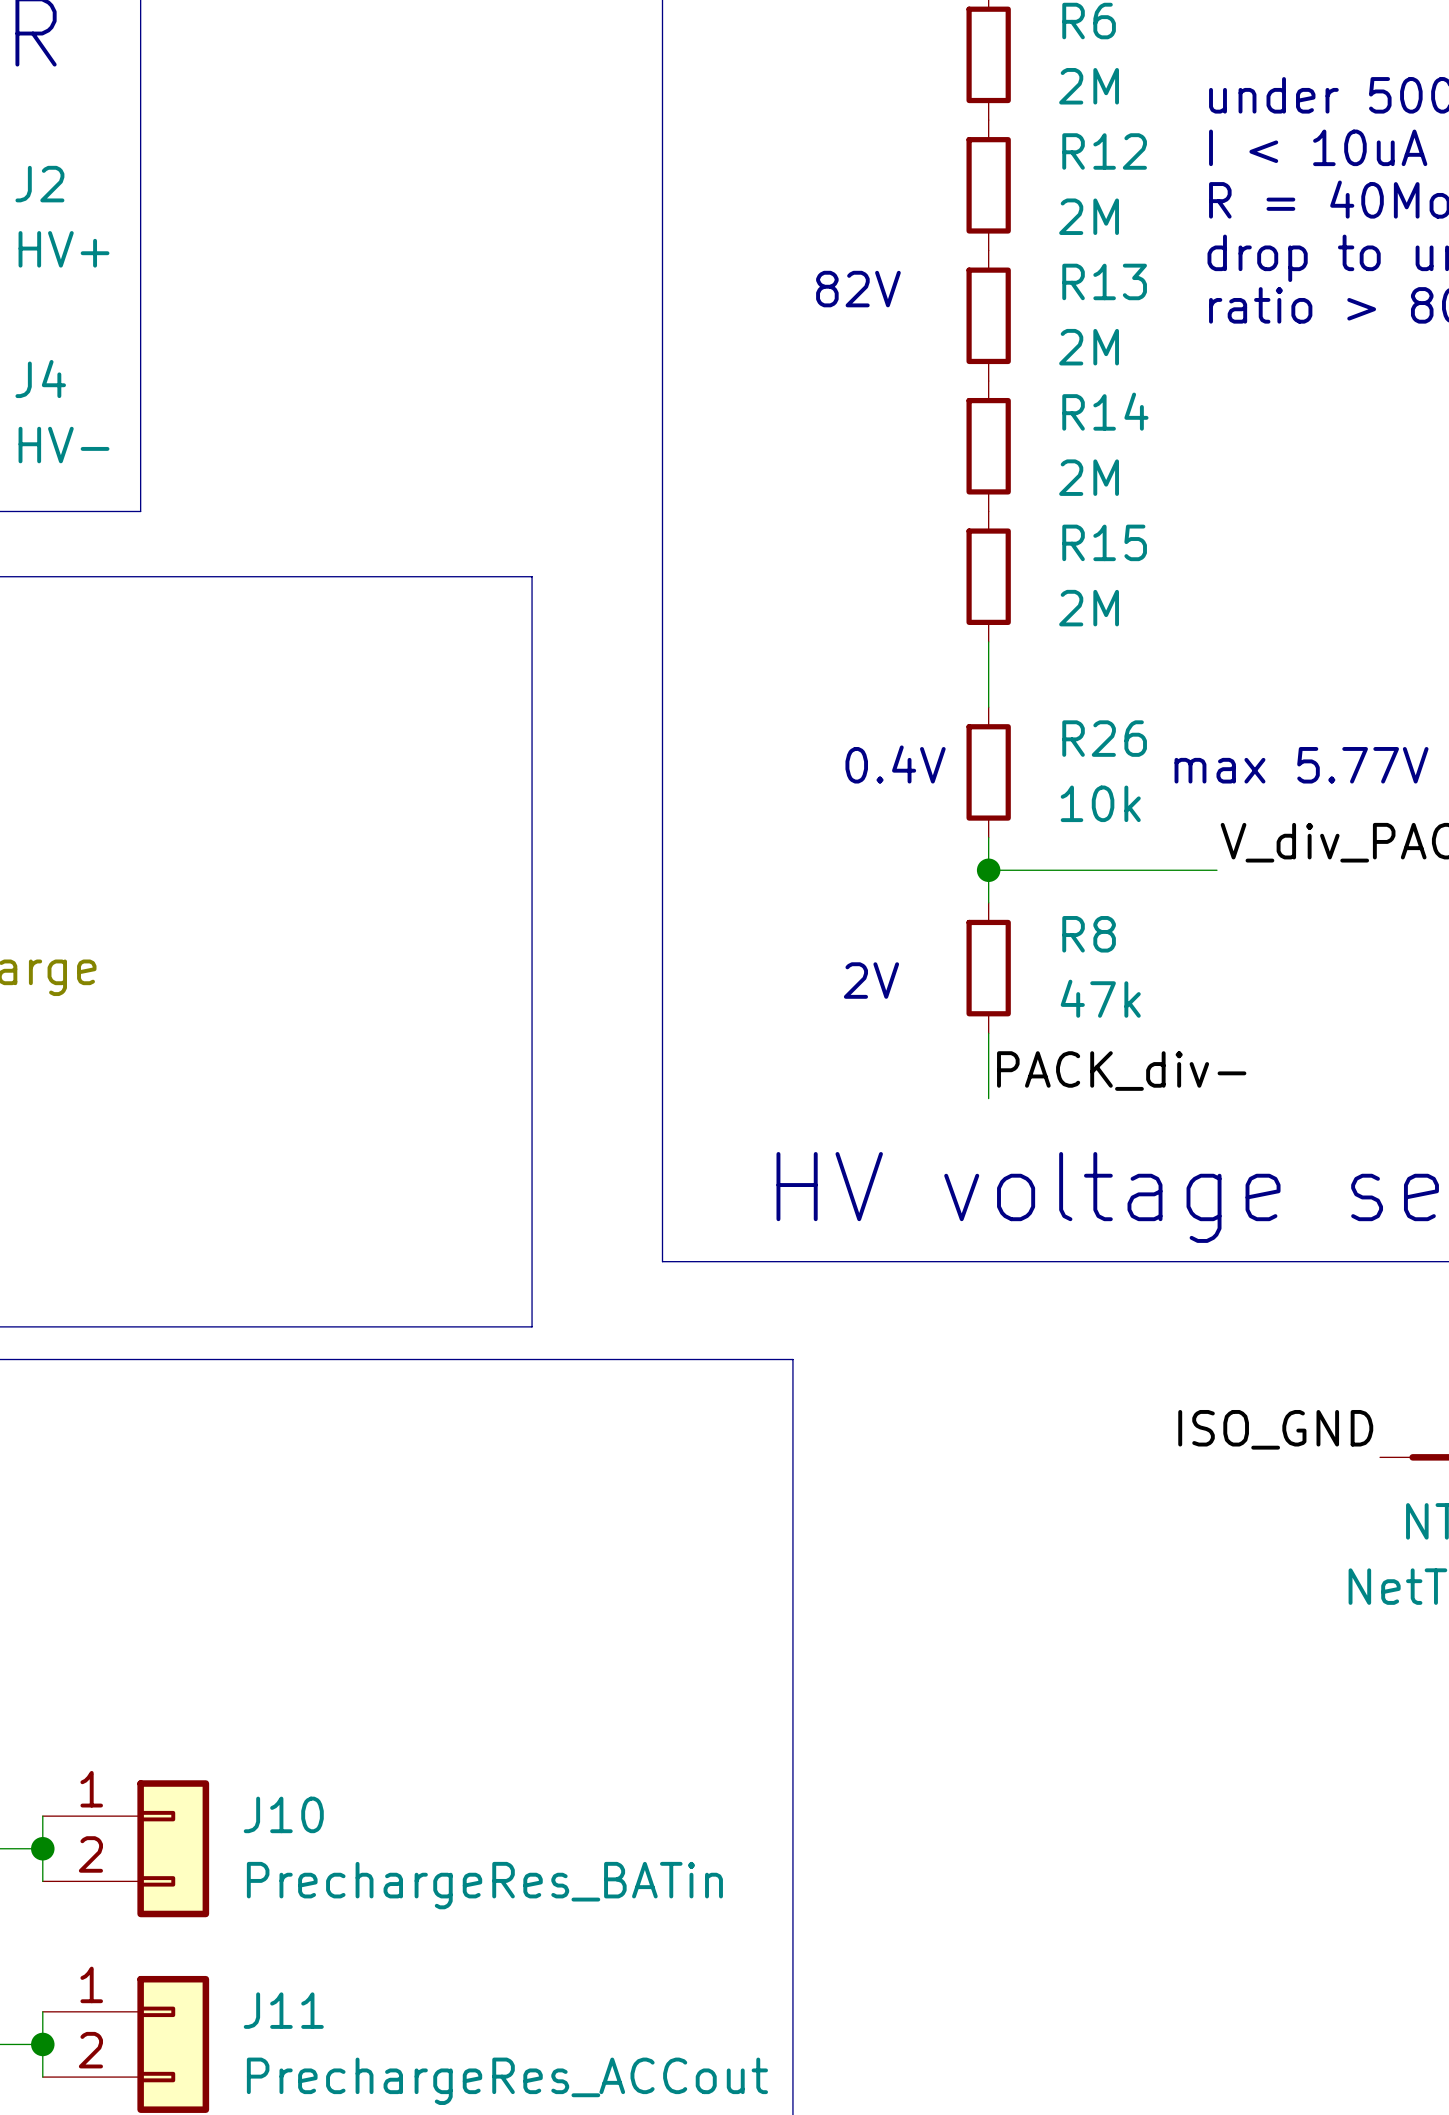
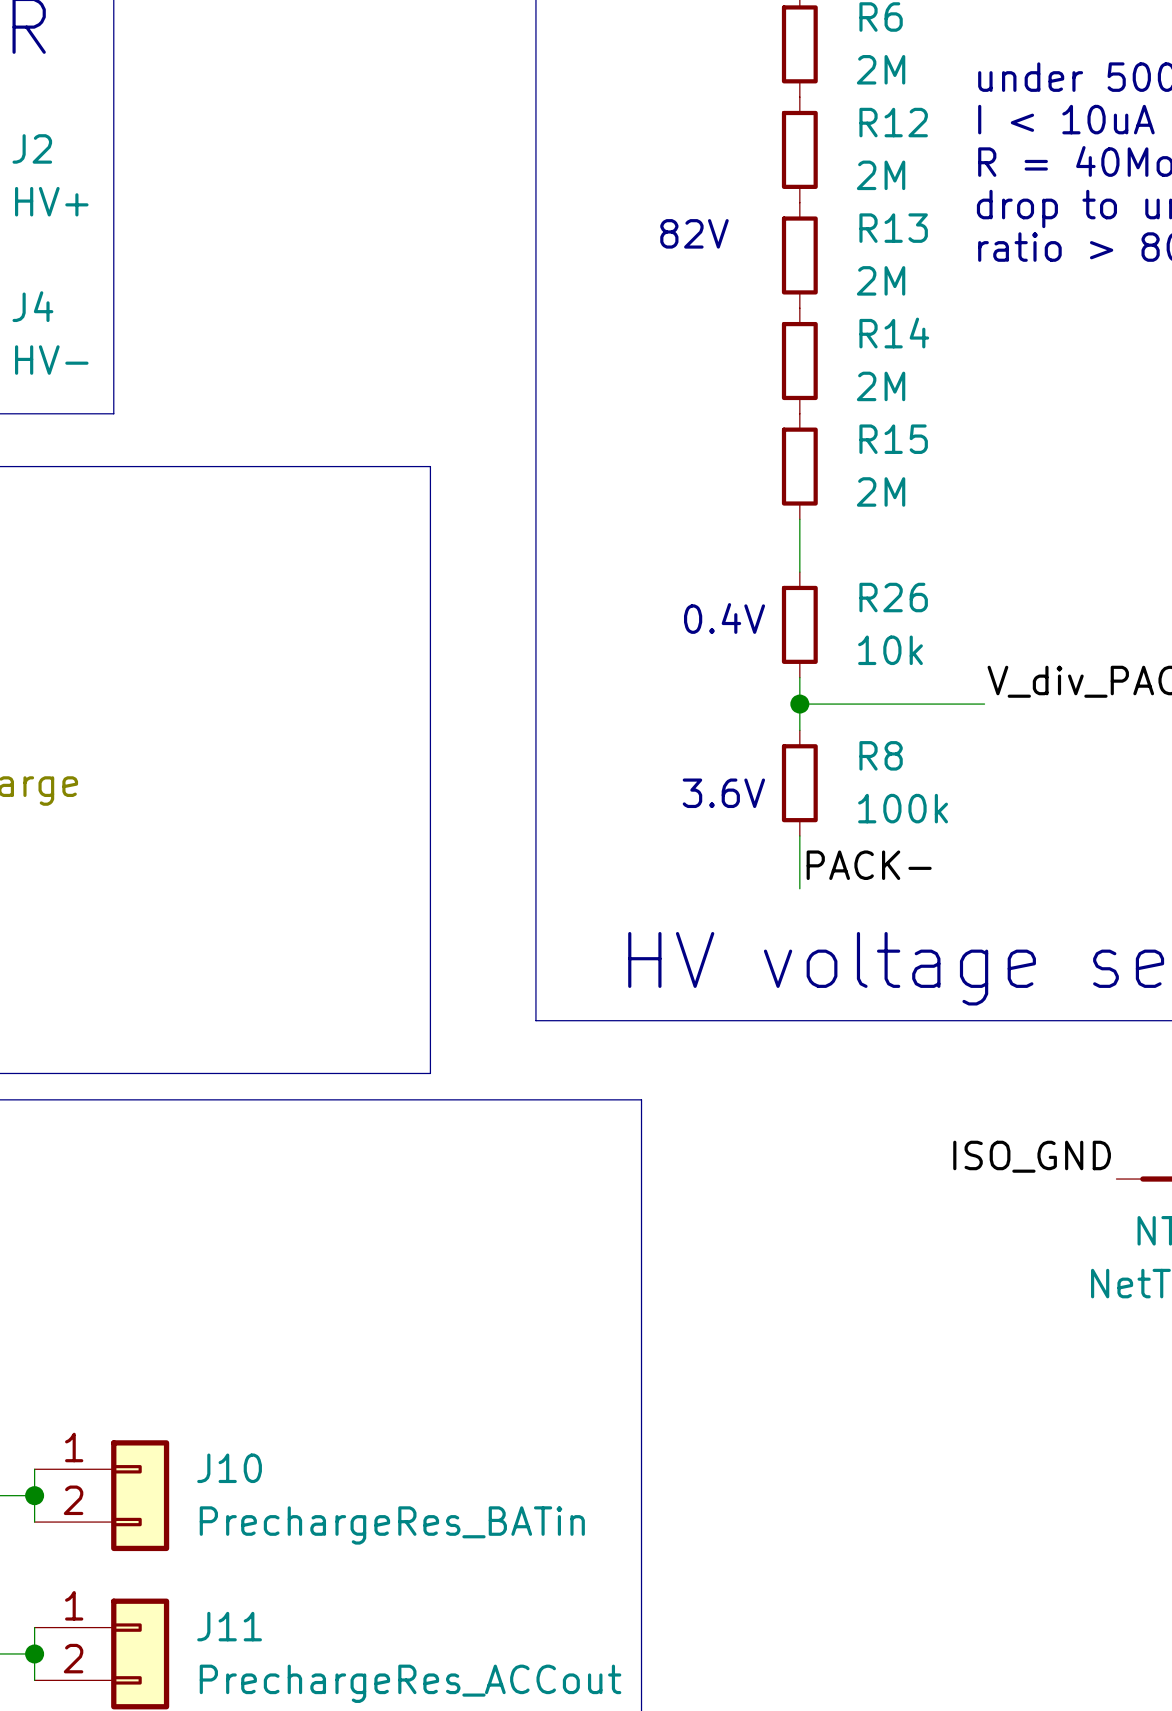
text: max 5.77V (1301, 765) -> none
text: 2V (871, 980) -> 3.6V (723, 793)
R8 value: 47k (1100, 998) -> 100k (903, 808)
label: PACK_div- (1121, 1071) -> PACK- (869, 865)

